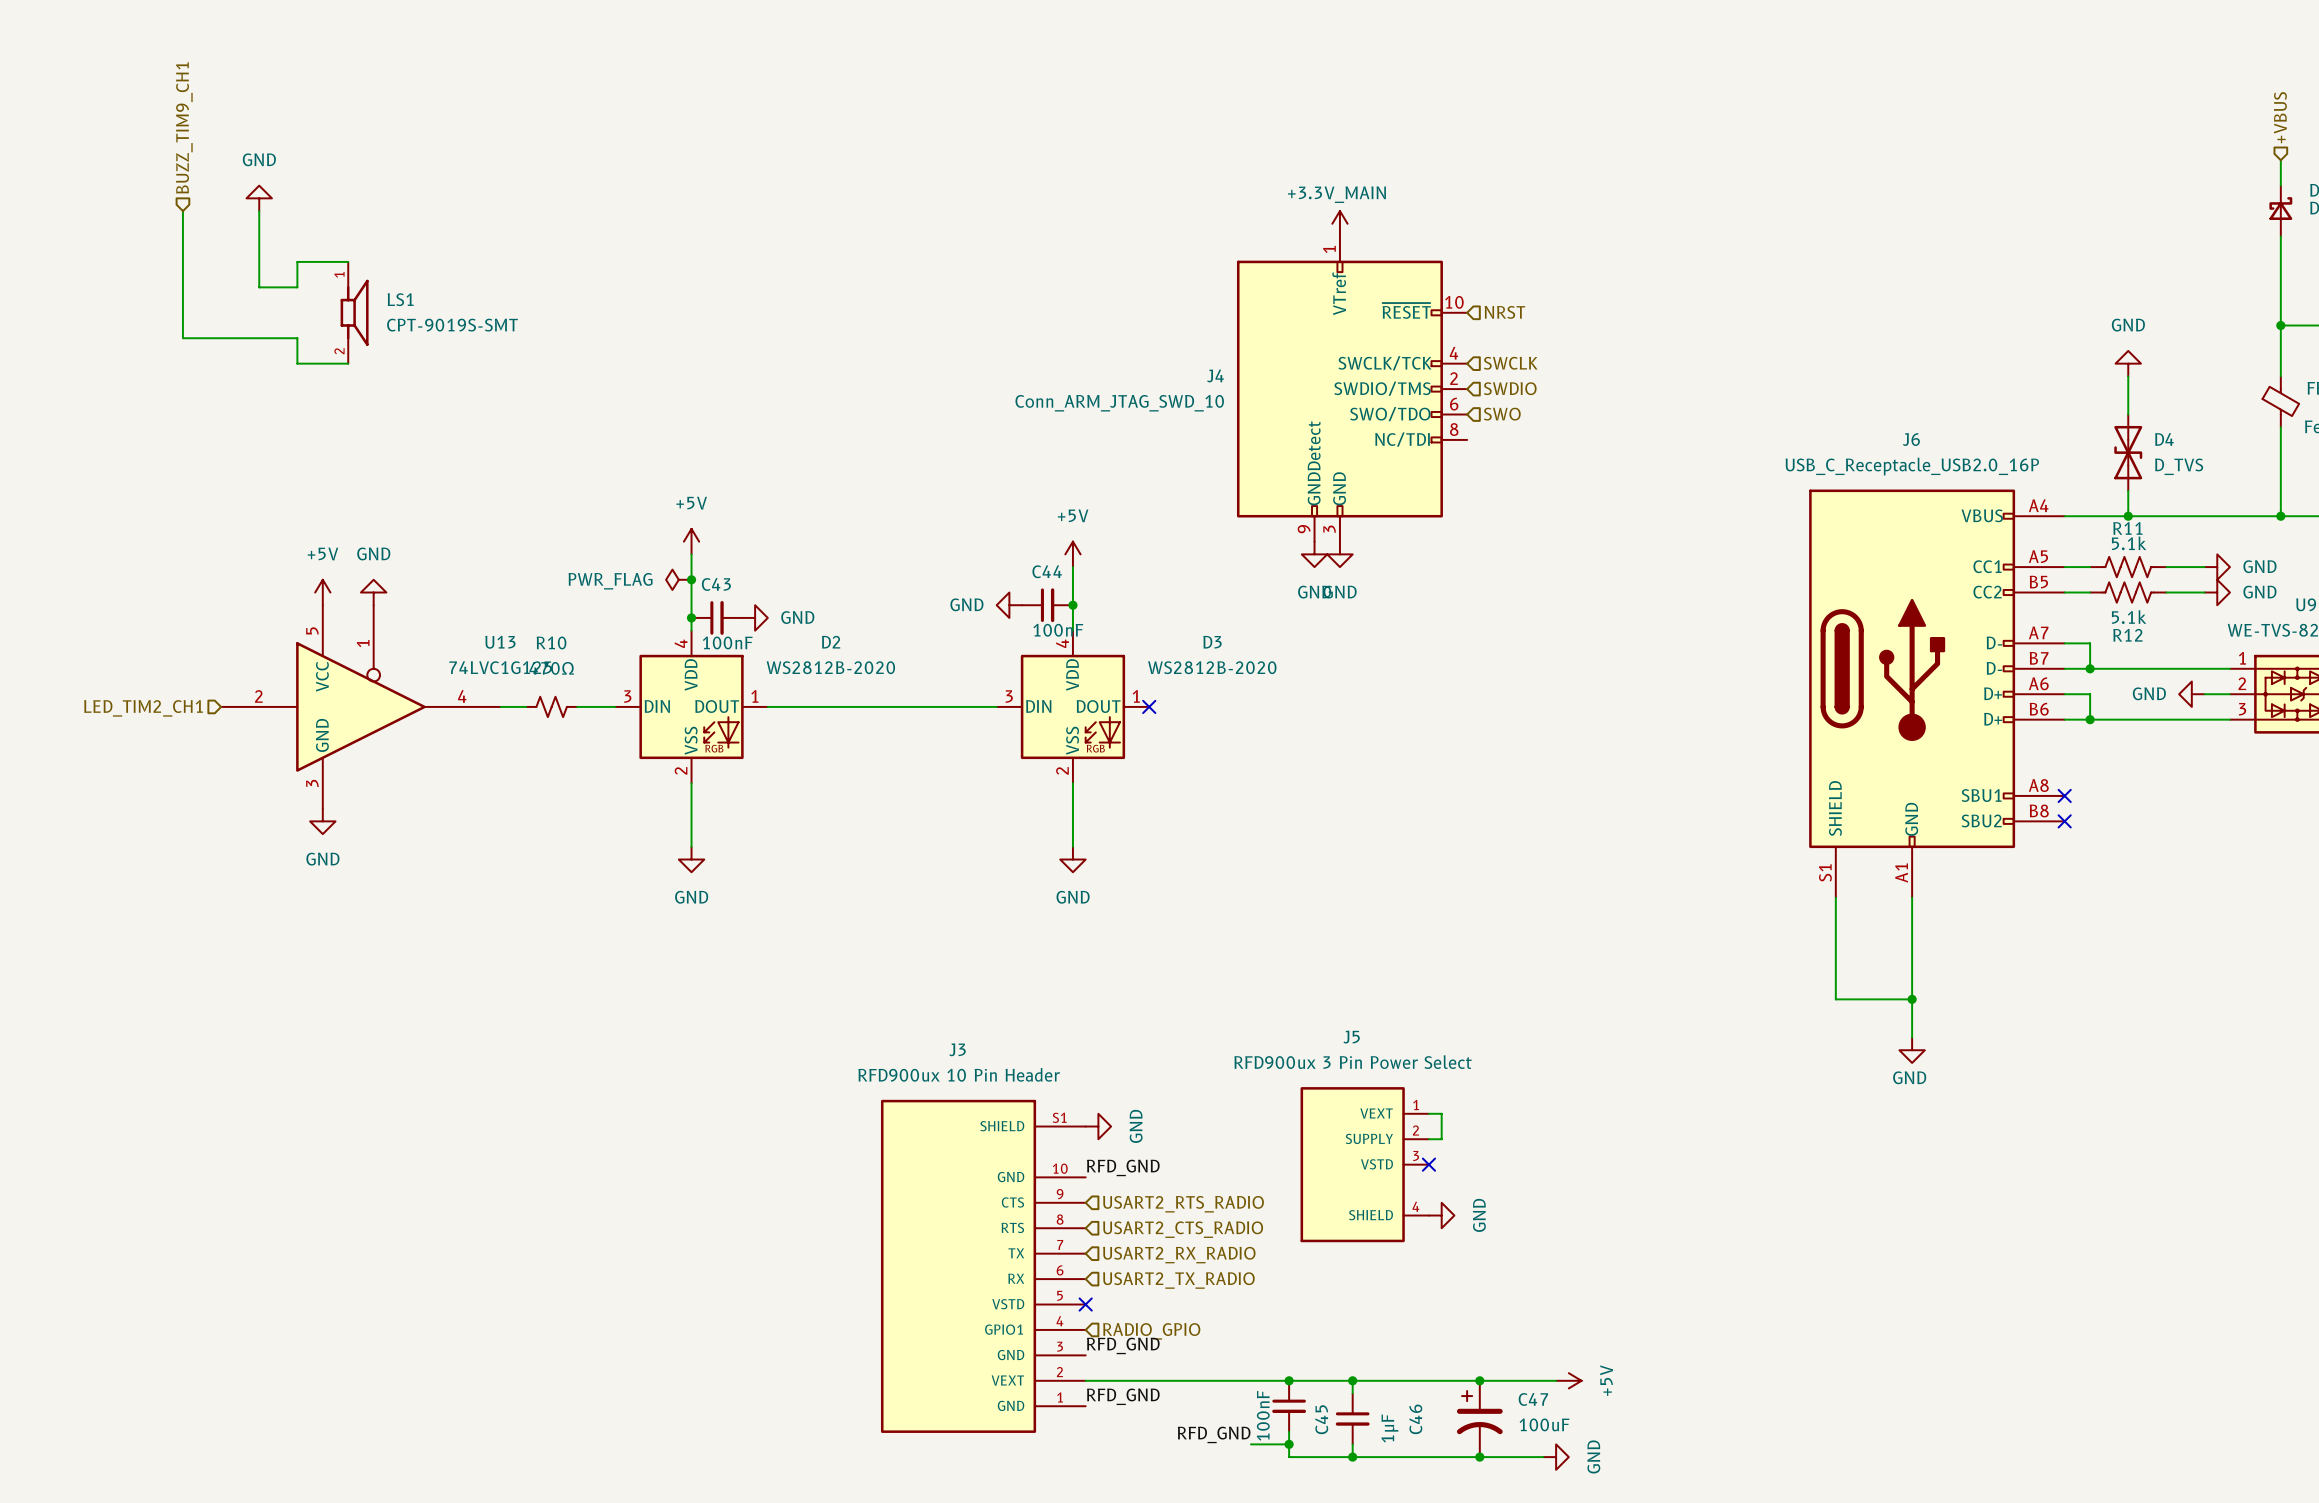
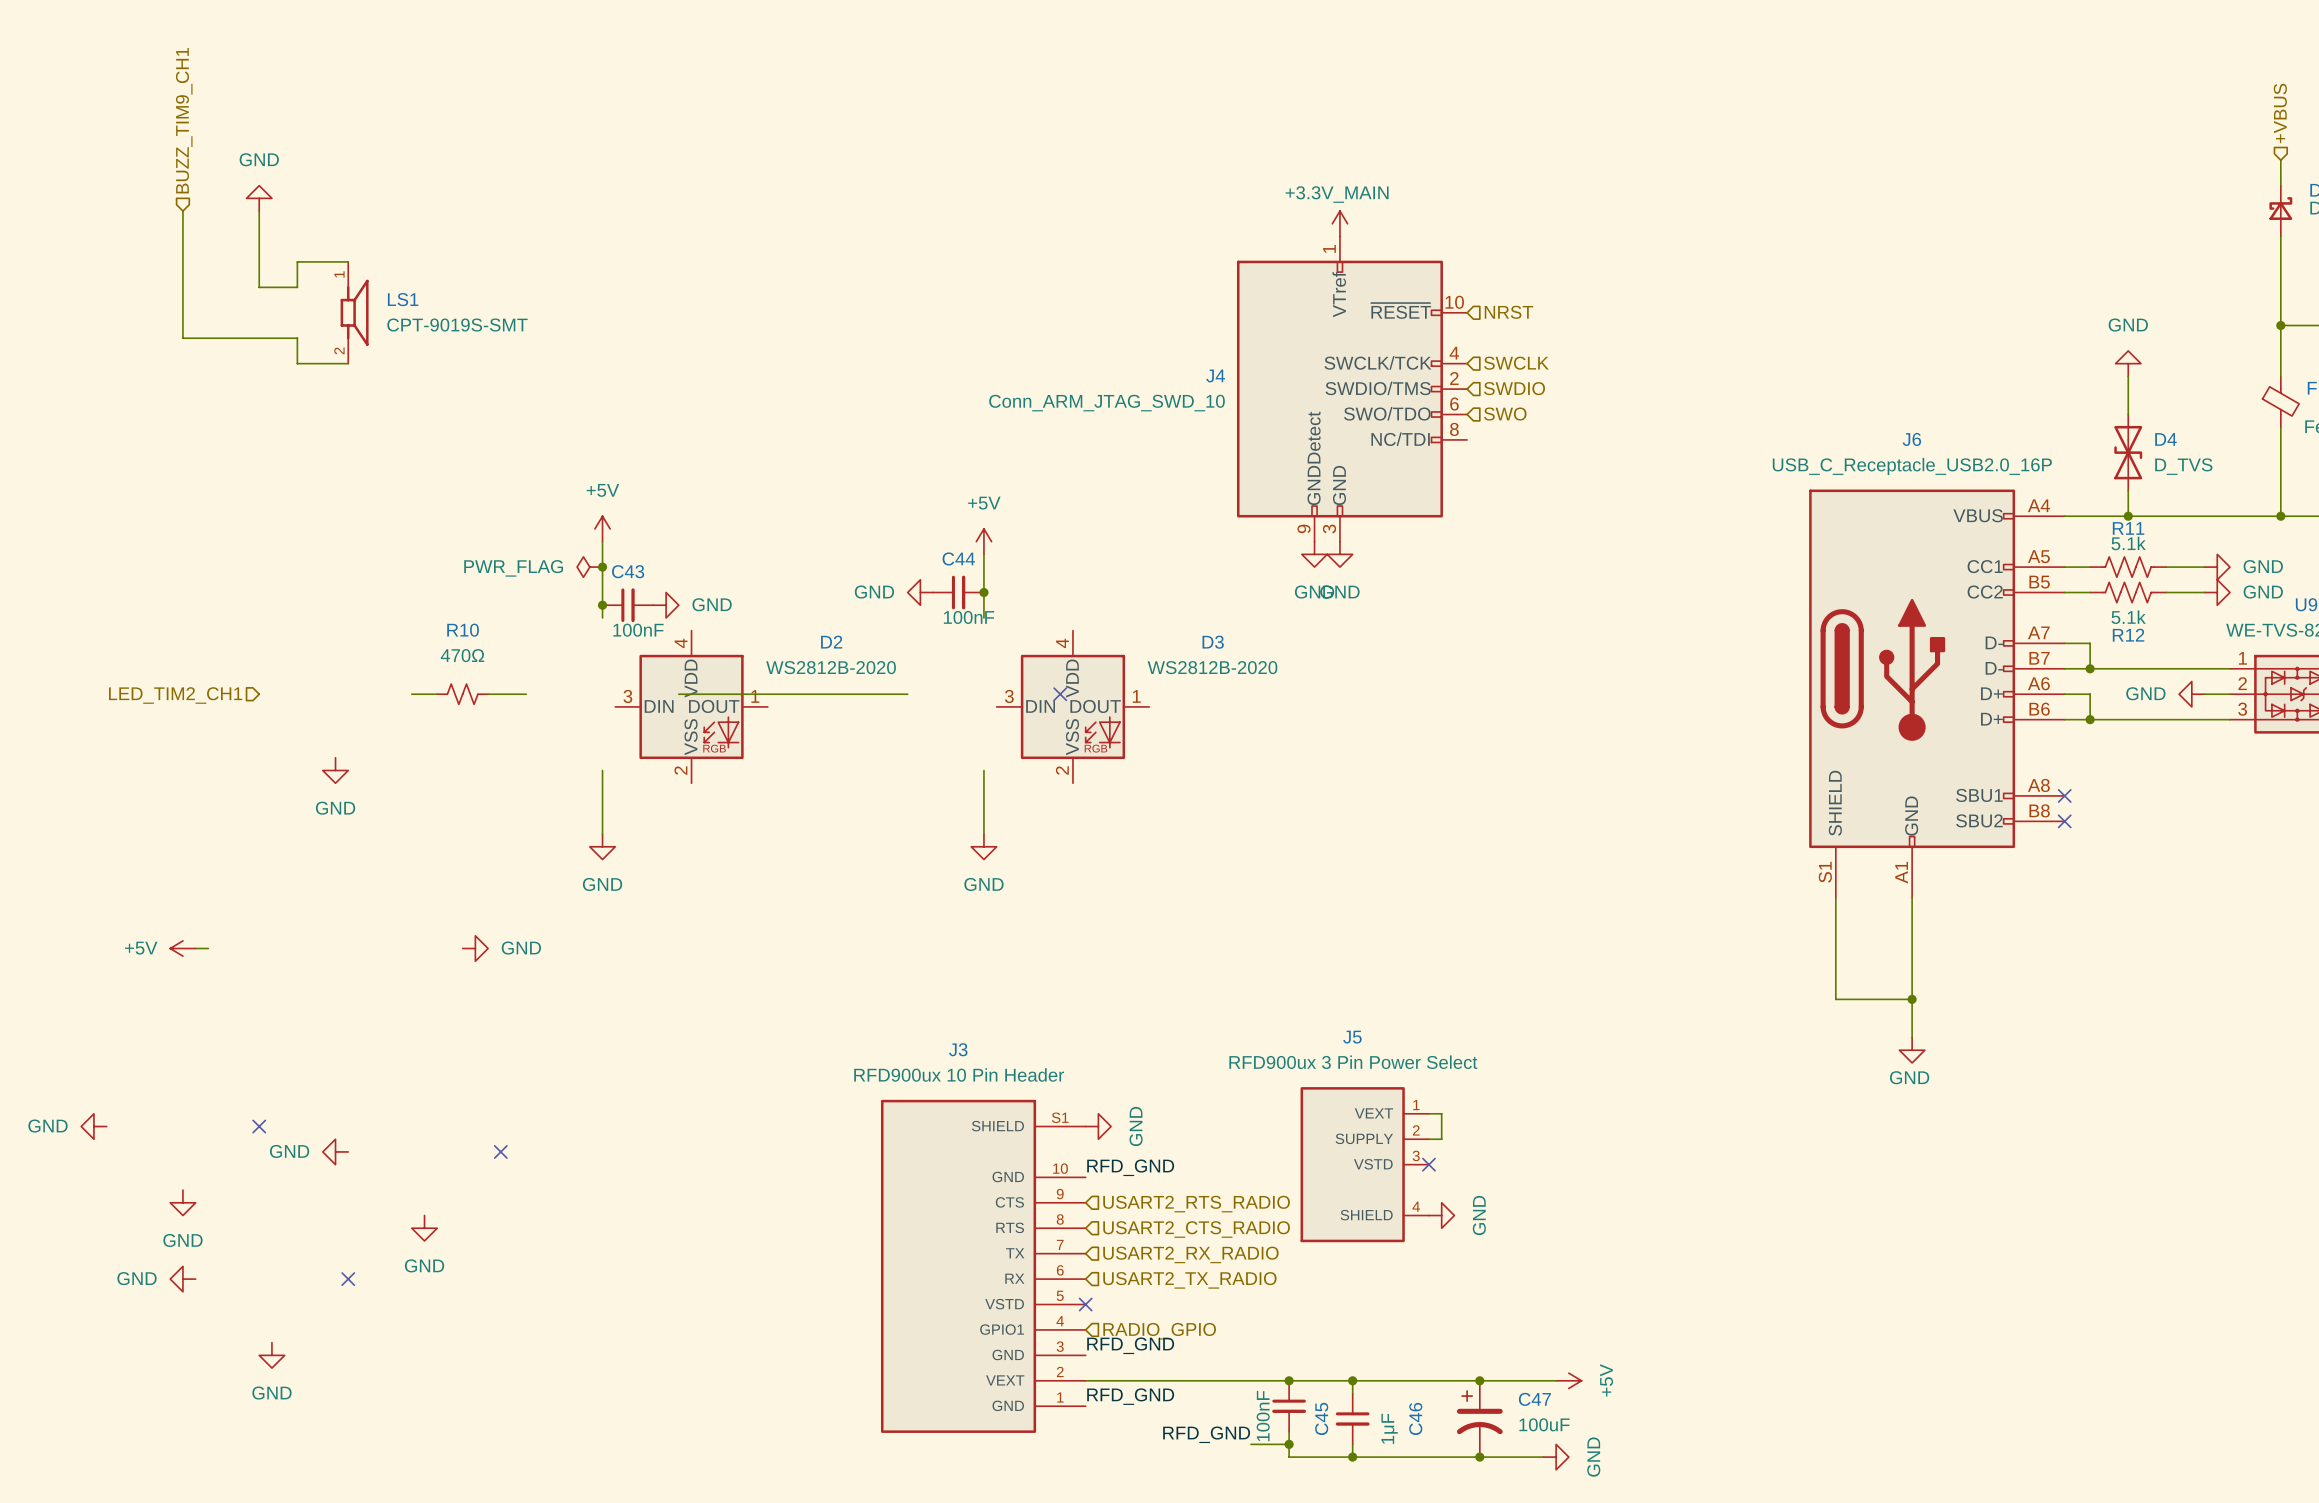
power symbol position: +5V (691, 541) -> +5V (602, 528)
wire: (691, 554) (691, 630) -> (602, 541) (602, 617)
power symbol position: +5V (1072, 554) -> +5V (983, 541)
junction: none -> (602, 567)
wire: (1072, 567) (1072, 630) -> (983, 554) (983, 617)
power symbol position: PWR_FLAG (678, 579) -> PWR_FLAG (589, 567)
junction: (691, 579) -> none
power symbol: +5V (322, 592) -> none
power symbol: GND (373, 592) -> none
power symbol: none -> GND (920, 592)
junction: none -> (983, 592)
junction: none -> (602, 605)
power symbol: none -> GND (666, 605)
power symbol: GND (1009, 605) -> none
C44 position: (1047, 605) -> (958, 592)
junction: (1072, 605) -> none
junction: (691, 617) -> none
C43 position: (716, 617) -> (627, 605)
power symbol: GND (755, 617) -> none
no-connect mark: none -> (1060, 694)
U13: 74LVC1G125 (360, 706) -> none
wire: (500, 706) (526, 706) -> (411, 694) (437, 694)
R10 position: (551, 706) -> (462, 694)
wire: (577, 706) (615, 706) -> (488, 694) (526, 694)
wire: (767, 706) (996, 706) -> (678, 694) (907, 694)
no-connect mark: (1149, 706) -> none
hierarchical label position: LED_TIM2_CH1 (143, 708) -> LED_TIM2_CH1 (175, 695)
wire: (691, 783) (691, 846) -> (602, 770) (602, 834)
wire: (1072, 783) (1072, 846) -> (983, 770) (983, 834)
power symbol position: GND (322, 821) -> GND (335, 770)
power symbol position: GND (691, 859) -> GND (602, 846)
power symbol position: GND (1072, 859) -> GND (983, 846)
power symbol: none -> +5V (182, 948)
wire: none -> (195, 948) (208, 948)
power symbol: none -> GND (475, 948)
power symbol: none -> GND (93, 1126)
no-connect mark: none -> (259, 1126)
power symbol: none -> GND (335, 1151)
no-connect mark: none -> (500, 1151)
power symbol: none -> GND (182, 1202)
power symbol: none -> GND (424, 1228)
power symbol: none -> GND (182, 1279)
no-connect mark: none -> (348, 1279)
power symbol: none -> GND (271, 1355)

